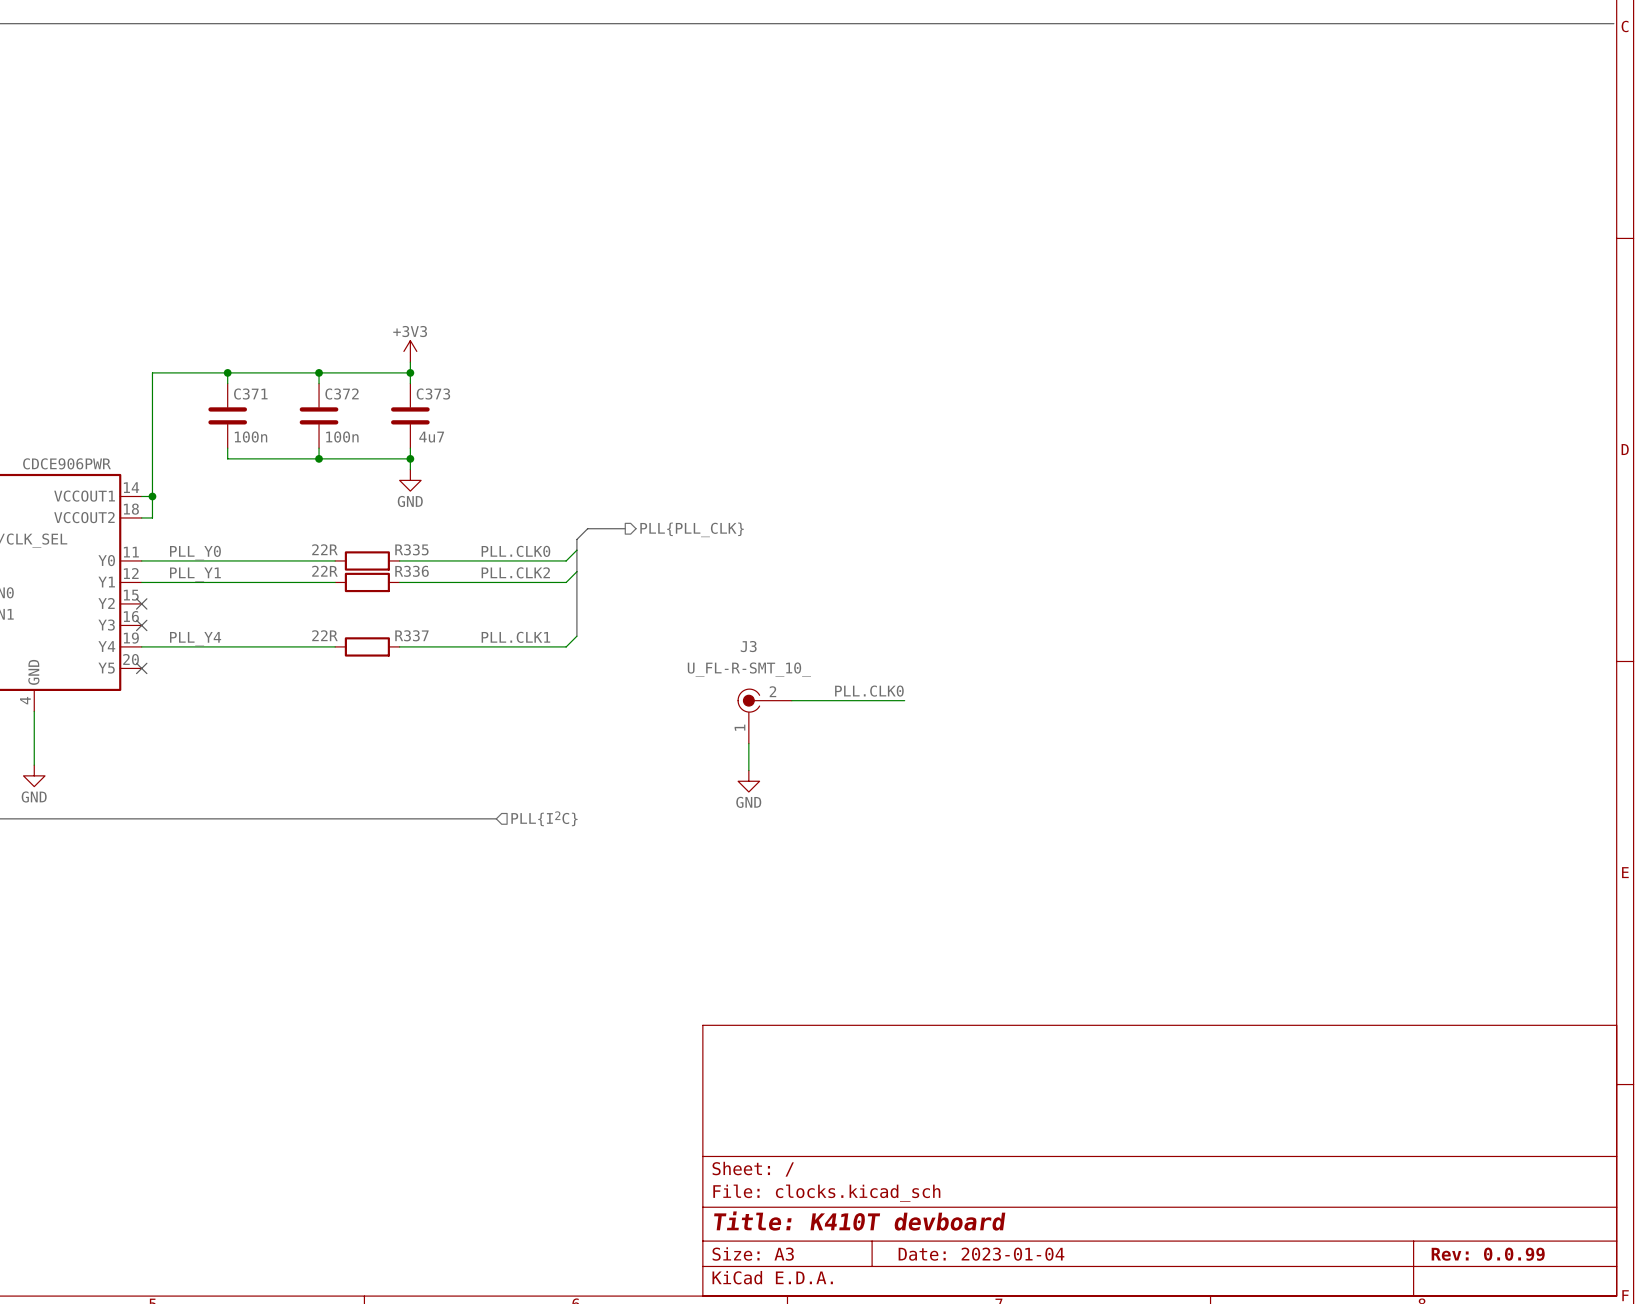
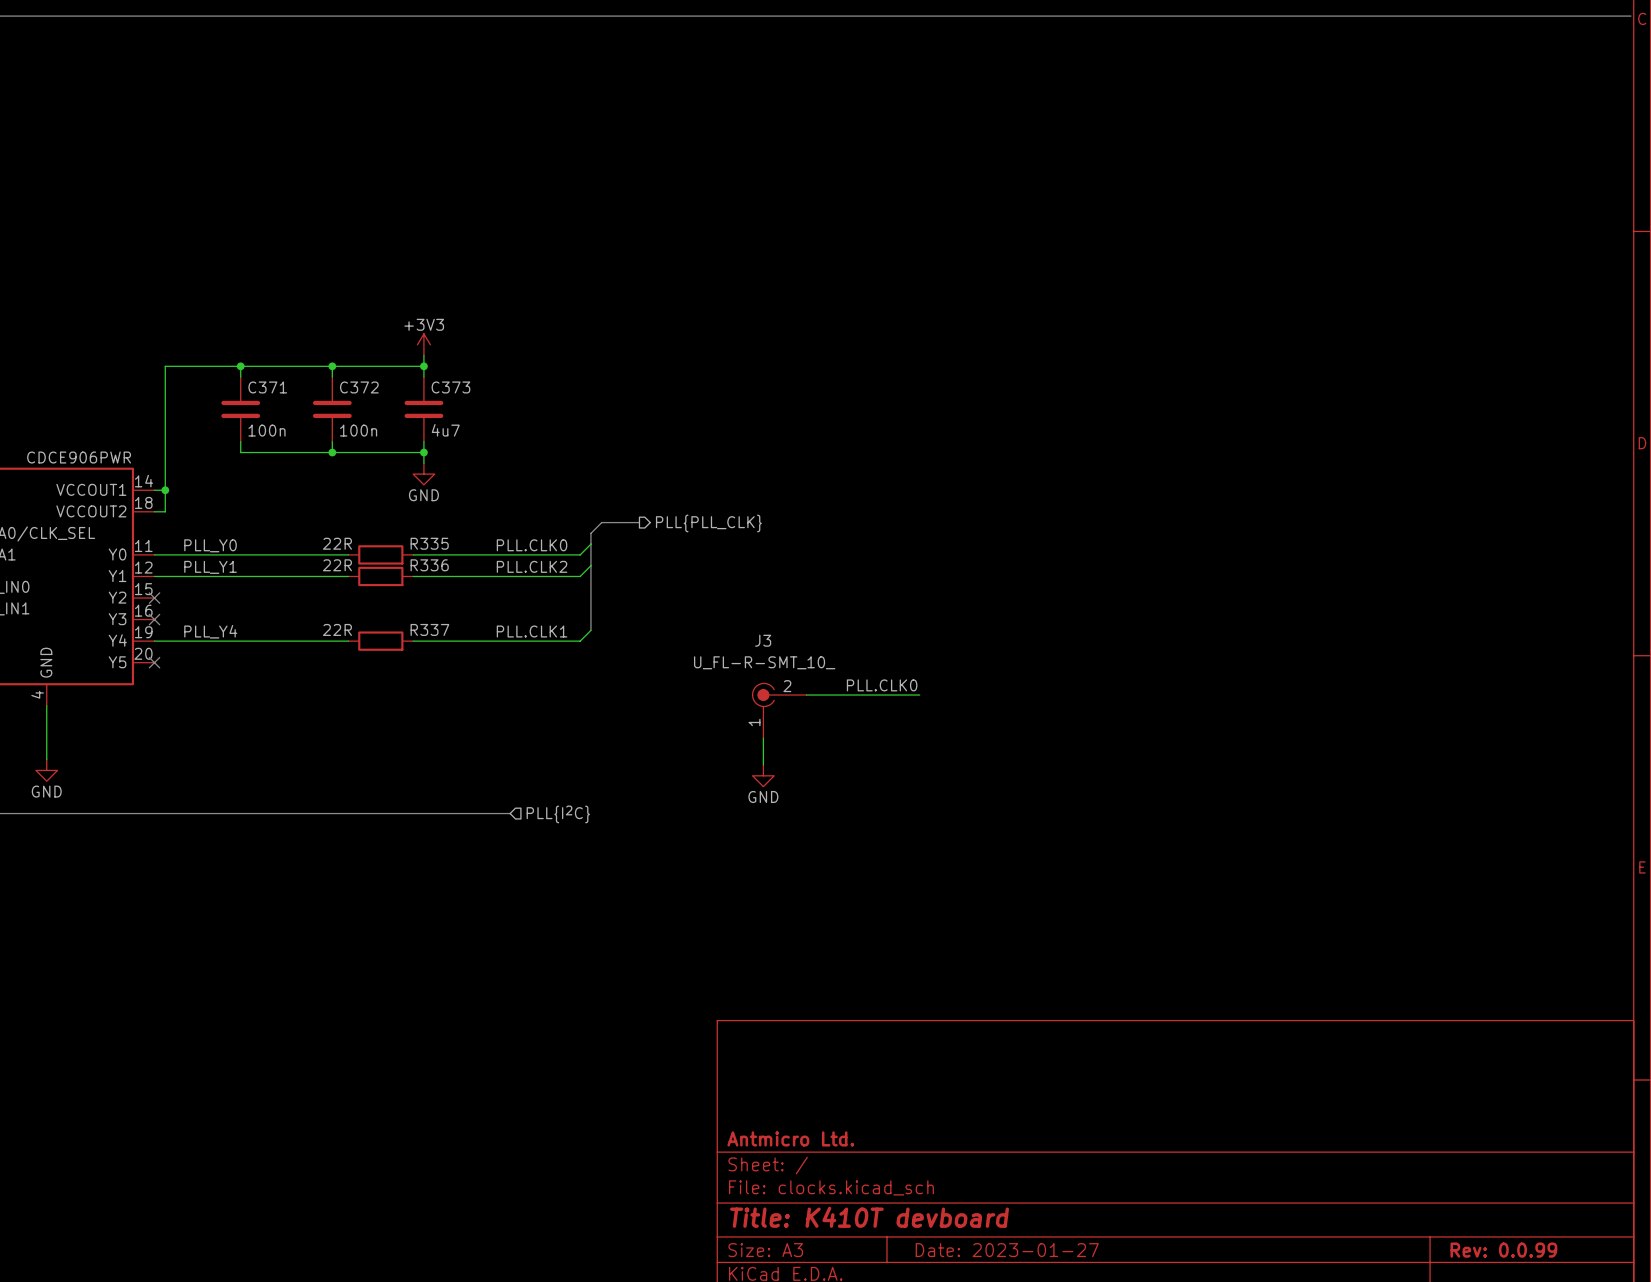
title block: none -> Antmicro Ltd. (790, 1138)
title block: Date: 2023-01-04 (981, 1254) -> Date: 2023-01-27 (1007, 1250)

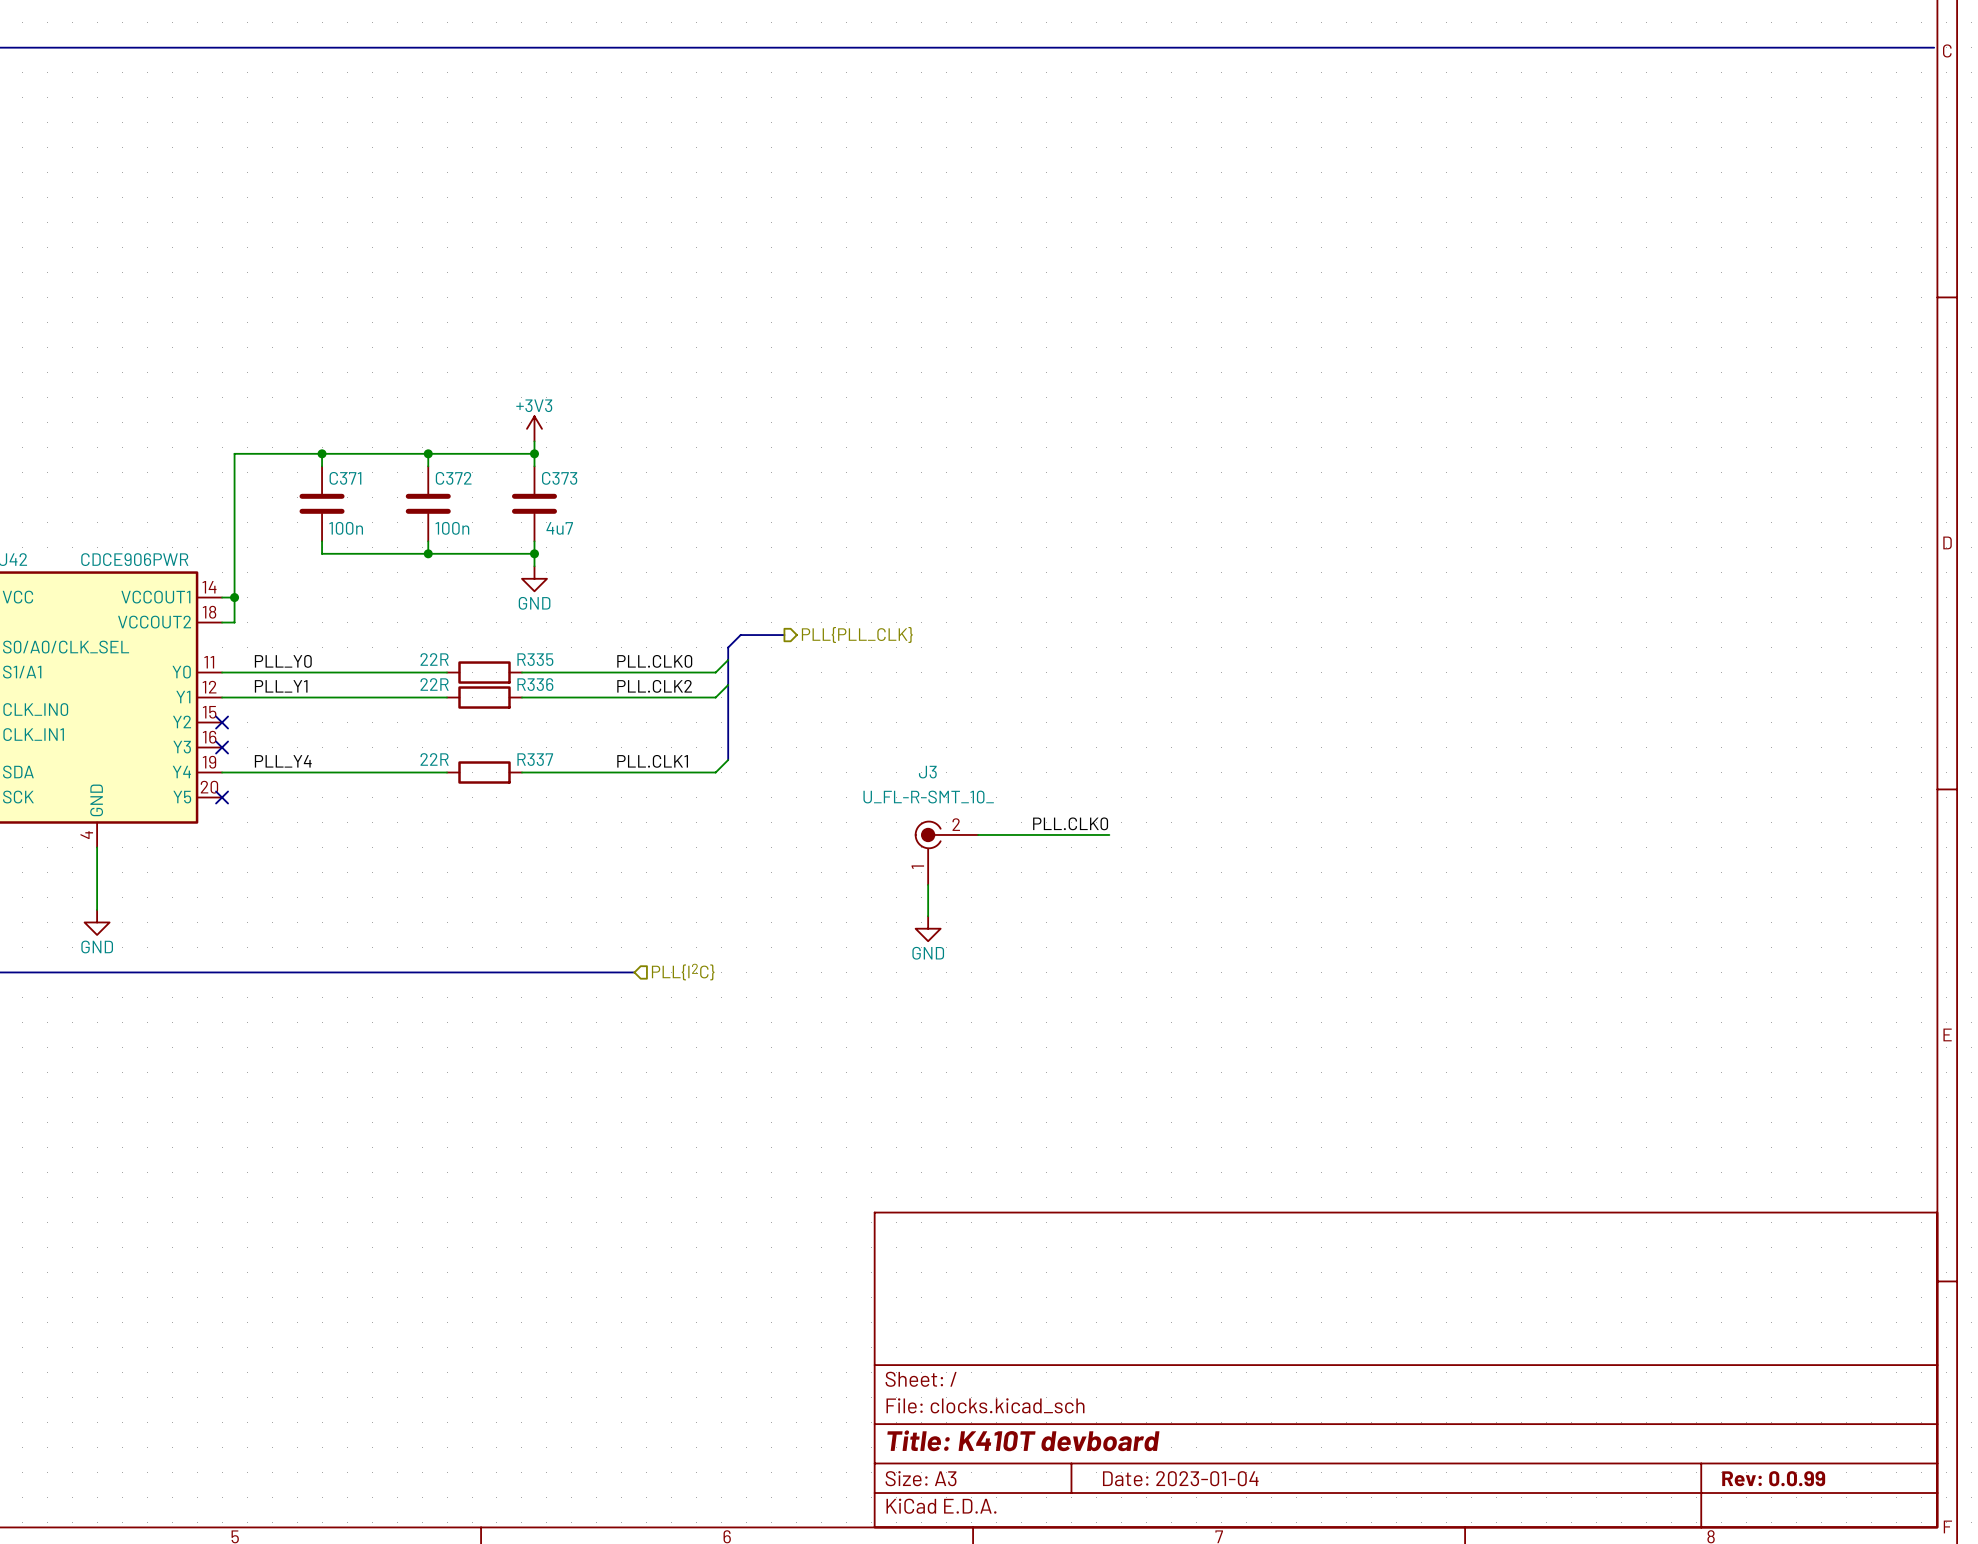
title block: Antmicro Ltd. (790, 1138) -> none
title block: Date: 2023-01-27 (1007, 1250) -> Date: 2023-01-04 (1180, 1478)

